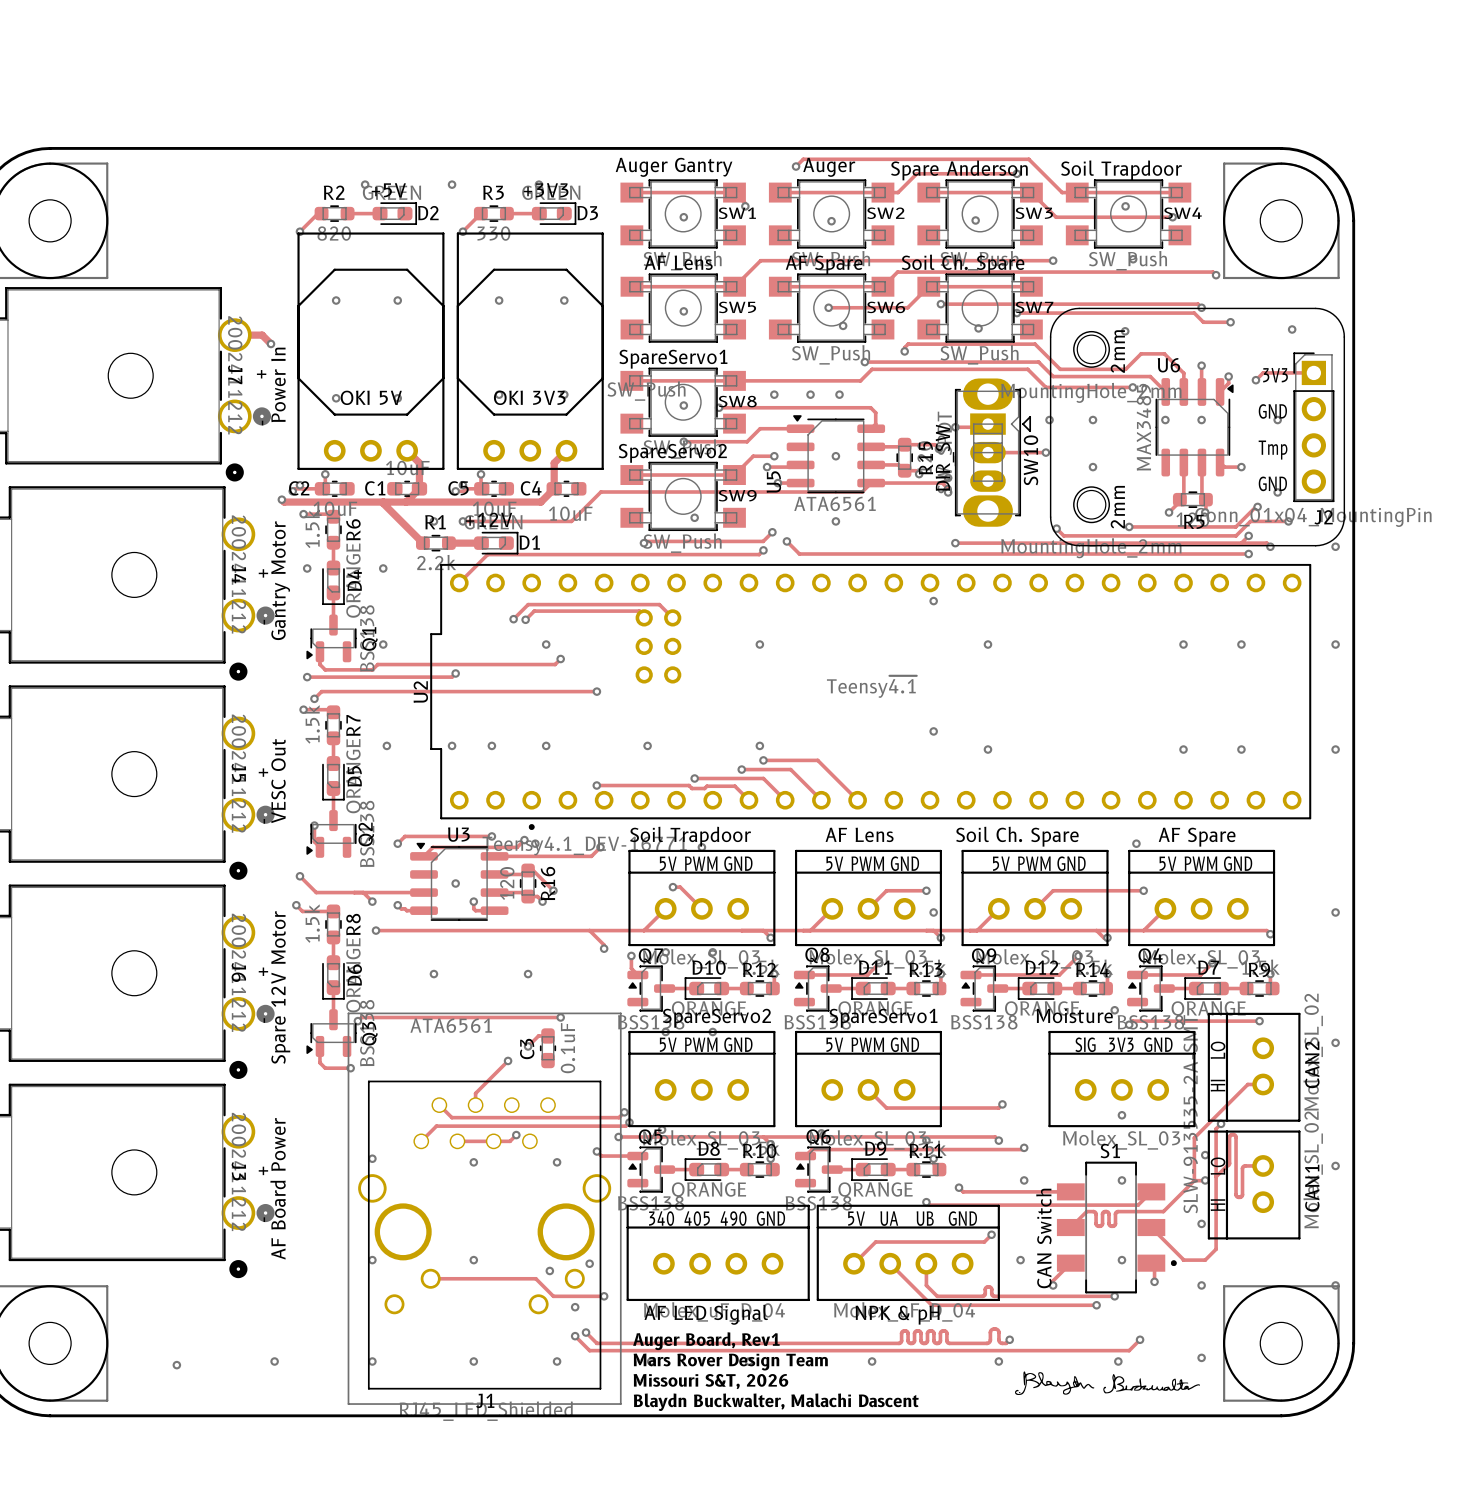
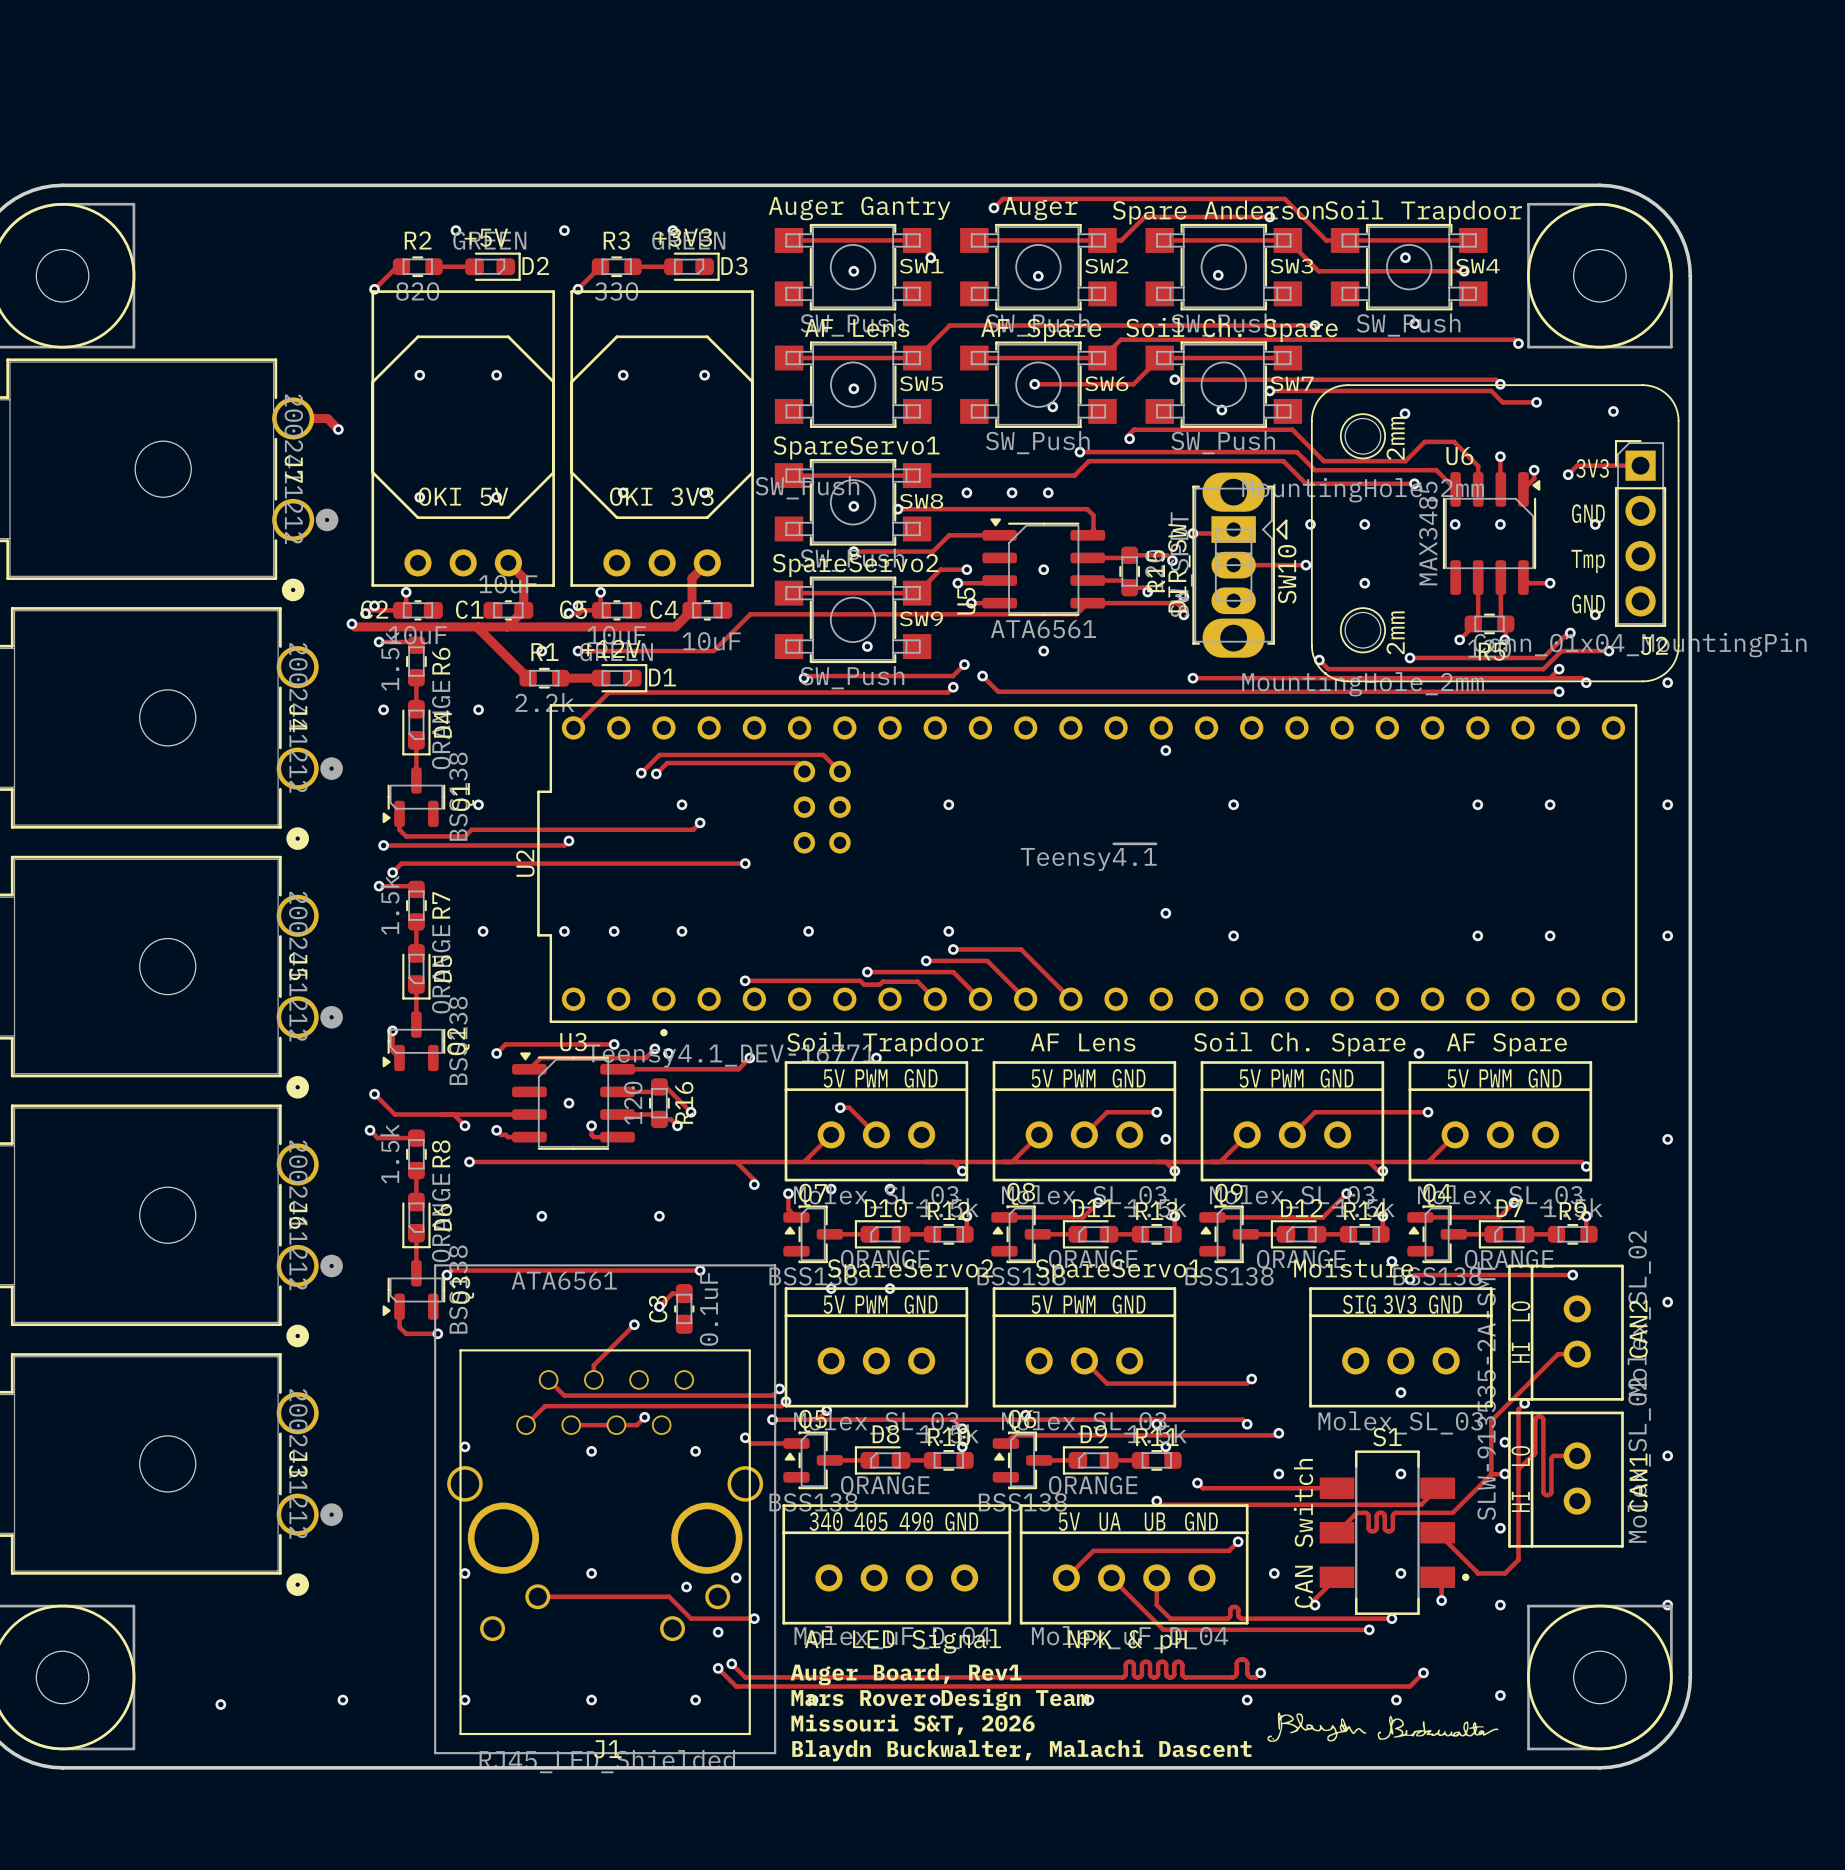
text: Power In (278, 384) -> none
text: - + (261, 397) -> none
text: Gantry Motor (280, 580) -> none
text: - + (263, 596) -> none
text: VESC Out (278, 781) -> none
text: - + (263, 796) -> none
text: Spare 12V Motor (280, 987) -> none
text: - + (263, 995) -> none
text: AF Board Power (278, 1188) -> none
text: - + (263, 1194) -> none

